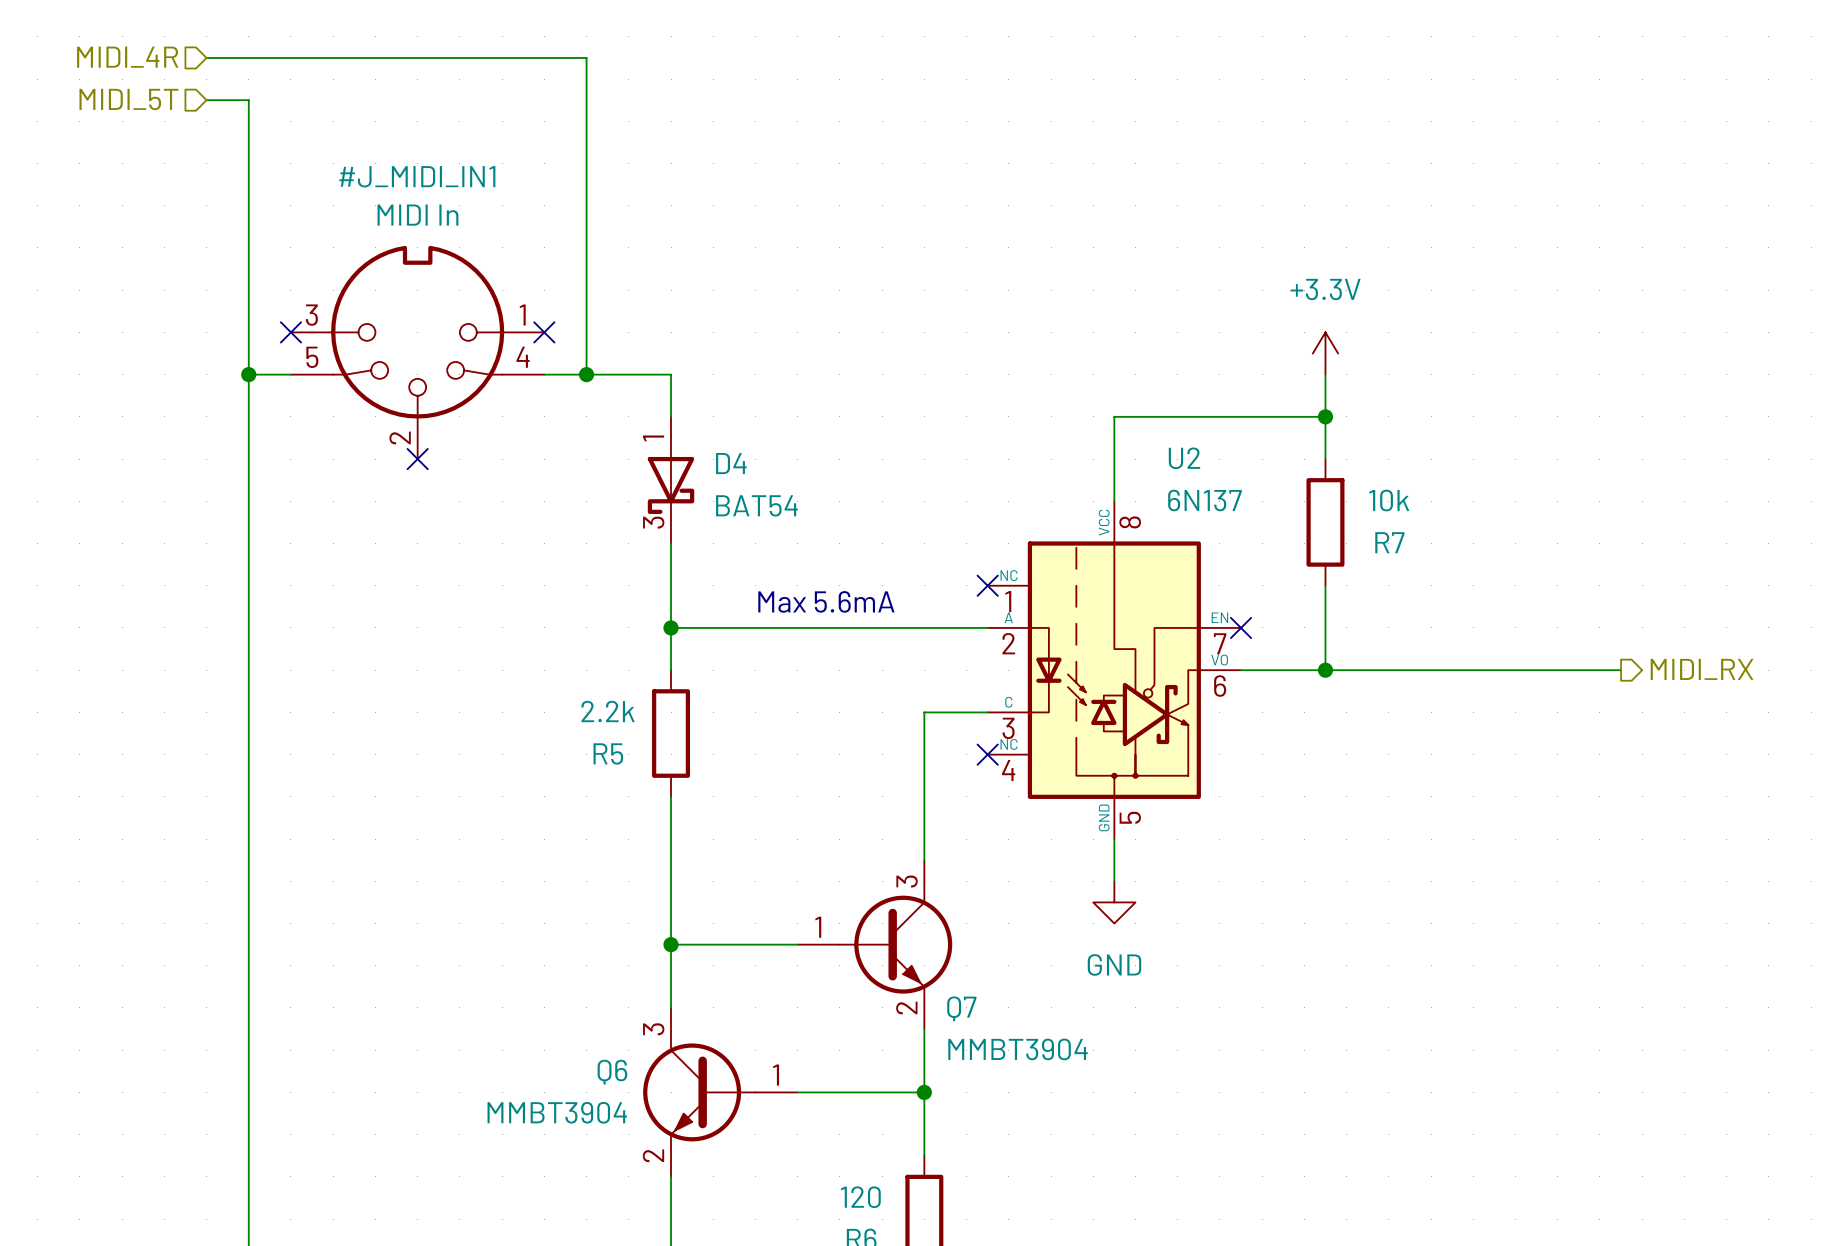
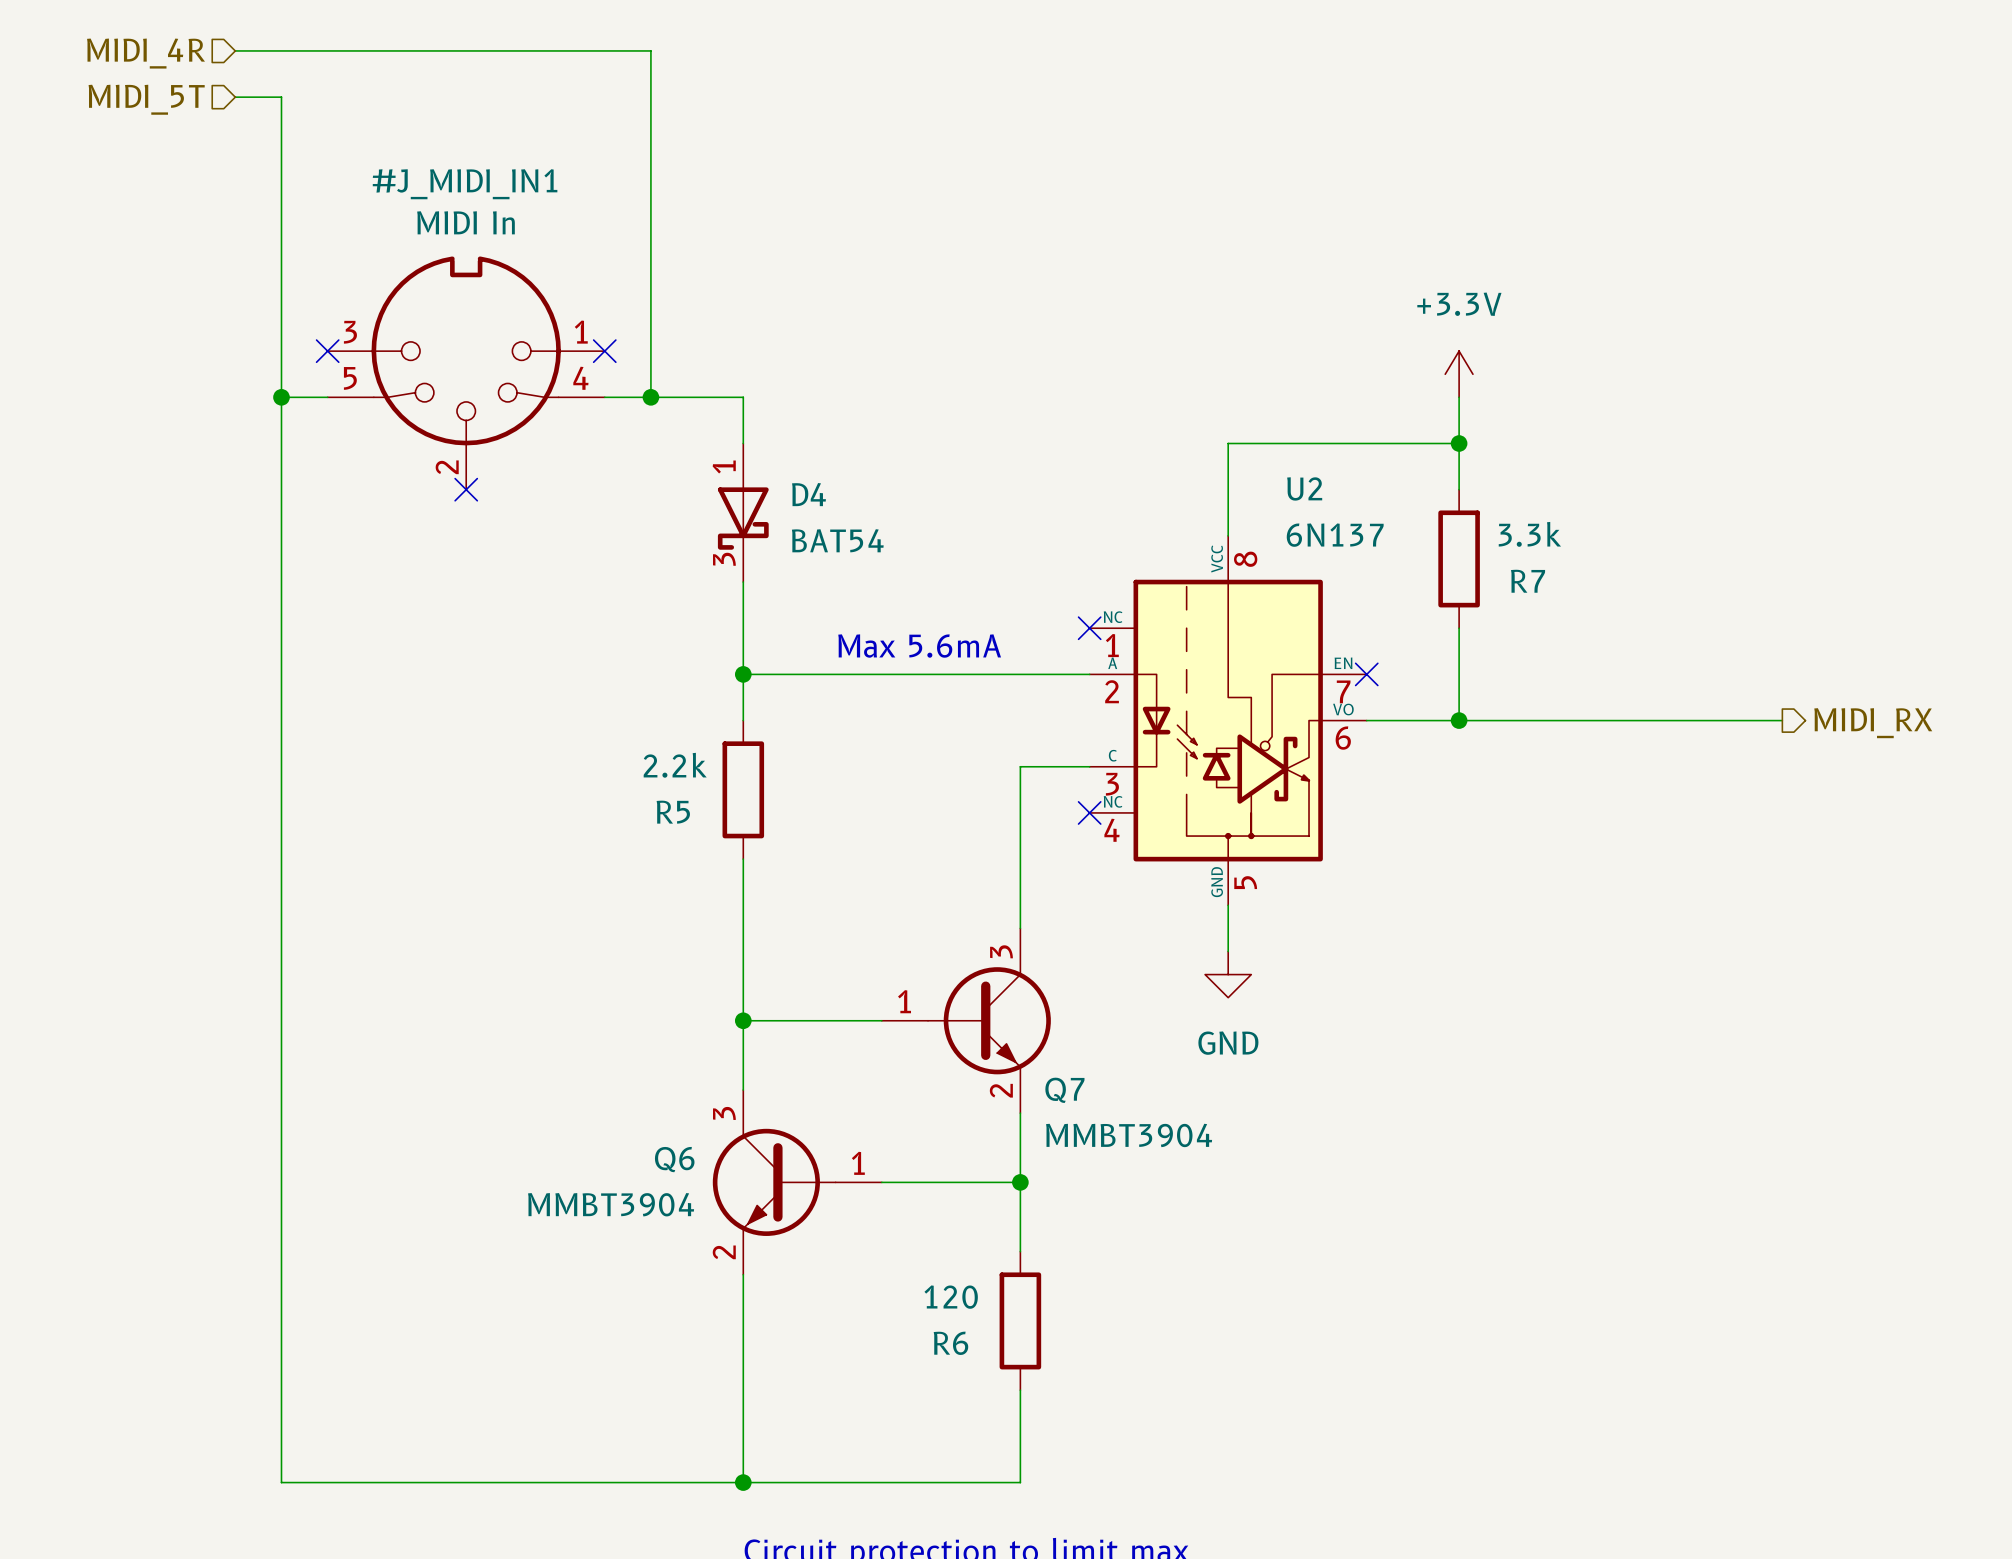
R7 value: 10k (1389, 500) -> 3.3k (1529, 534)

